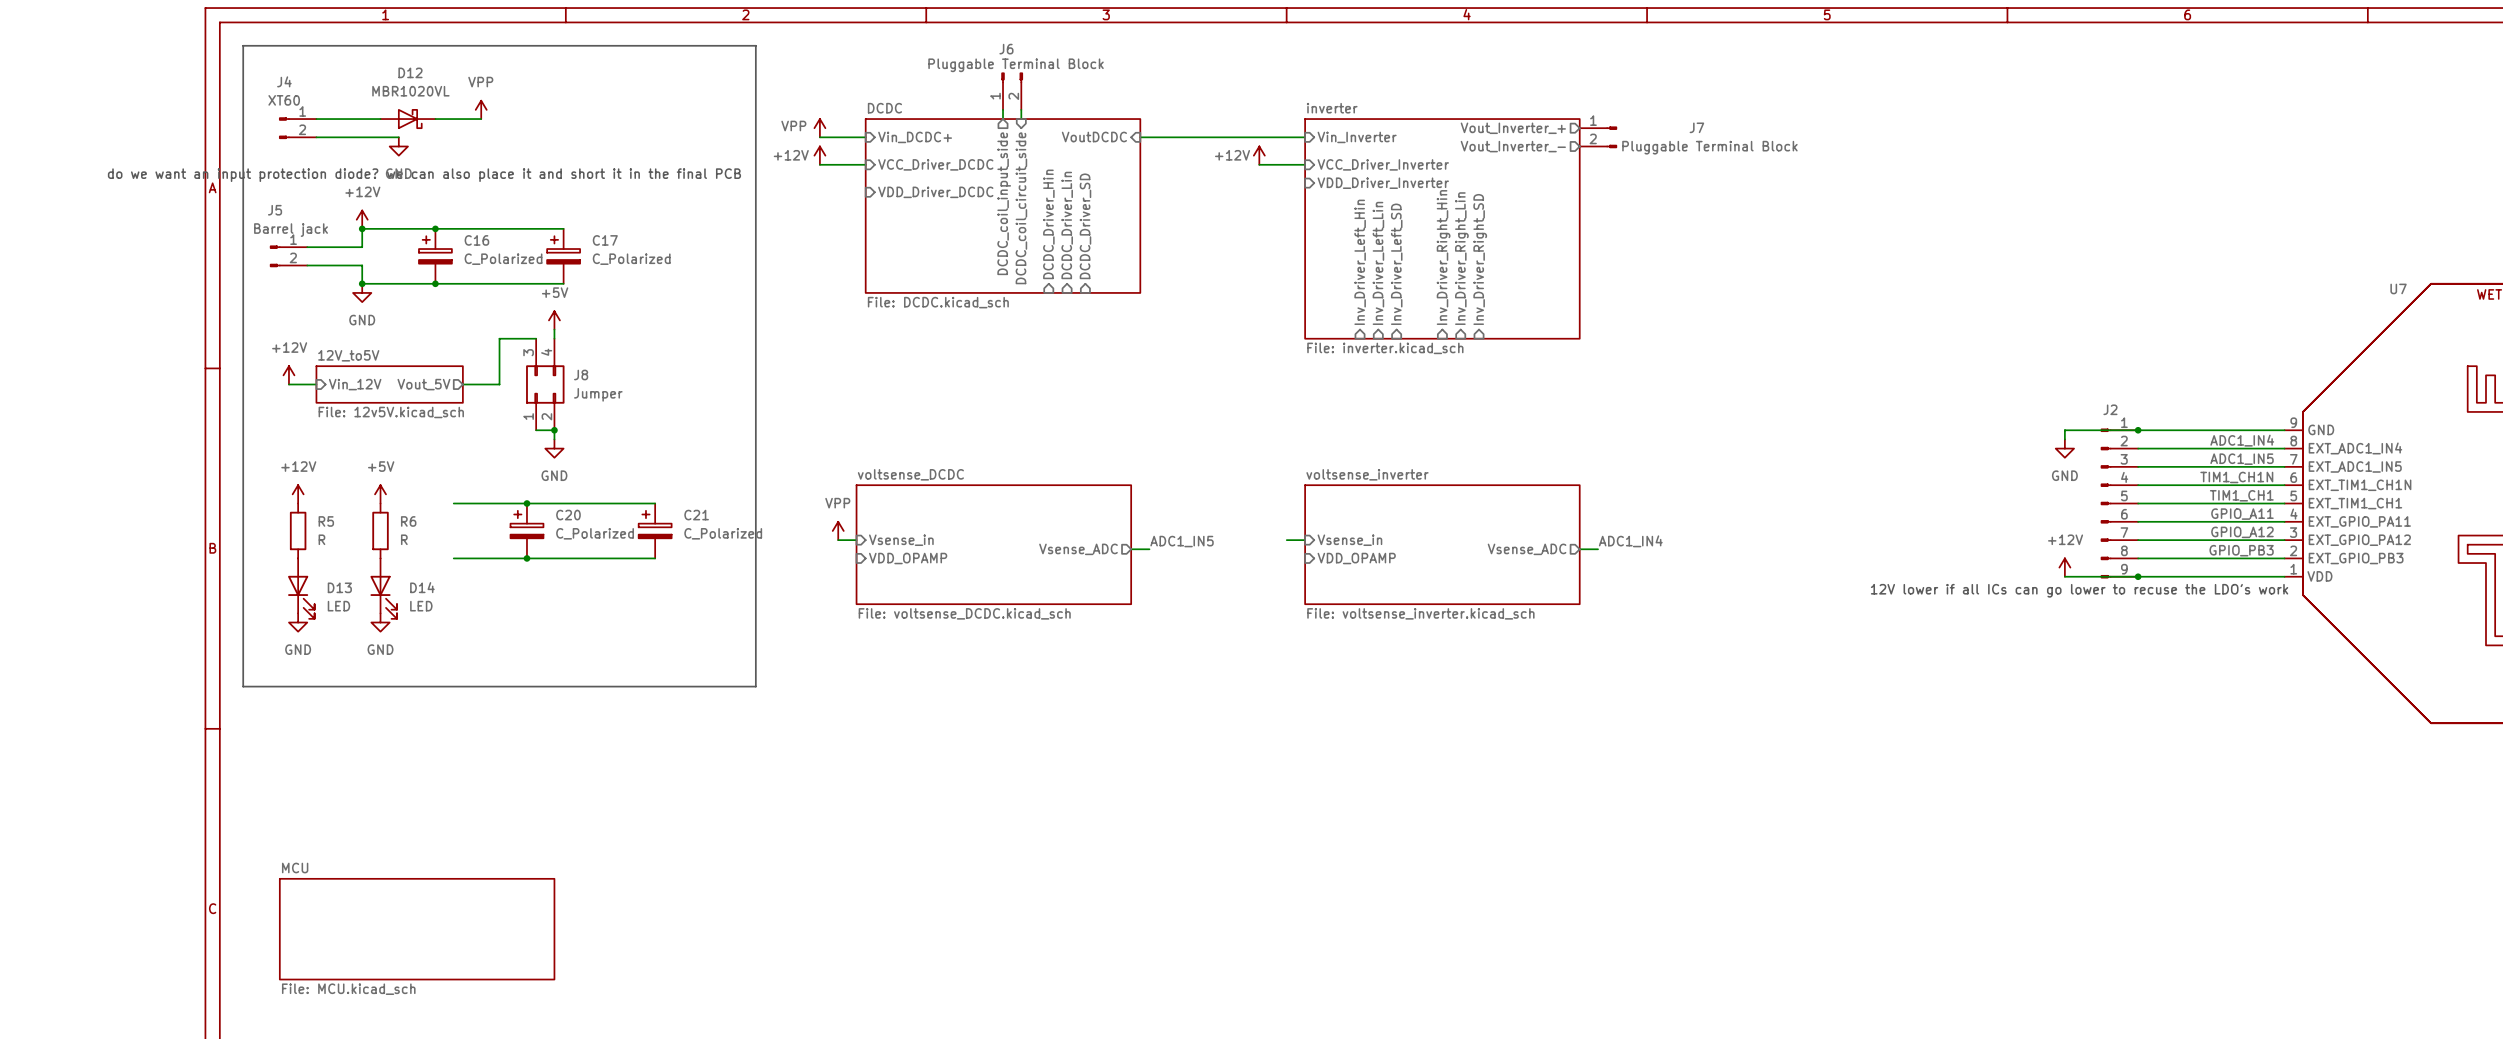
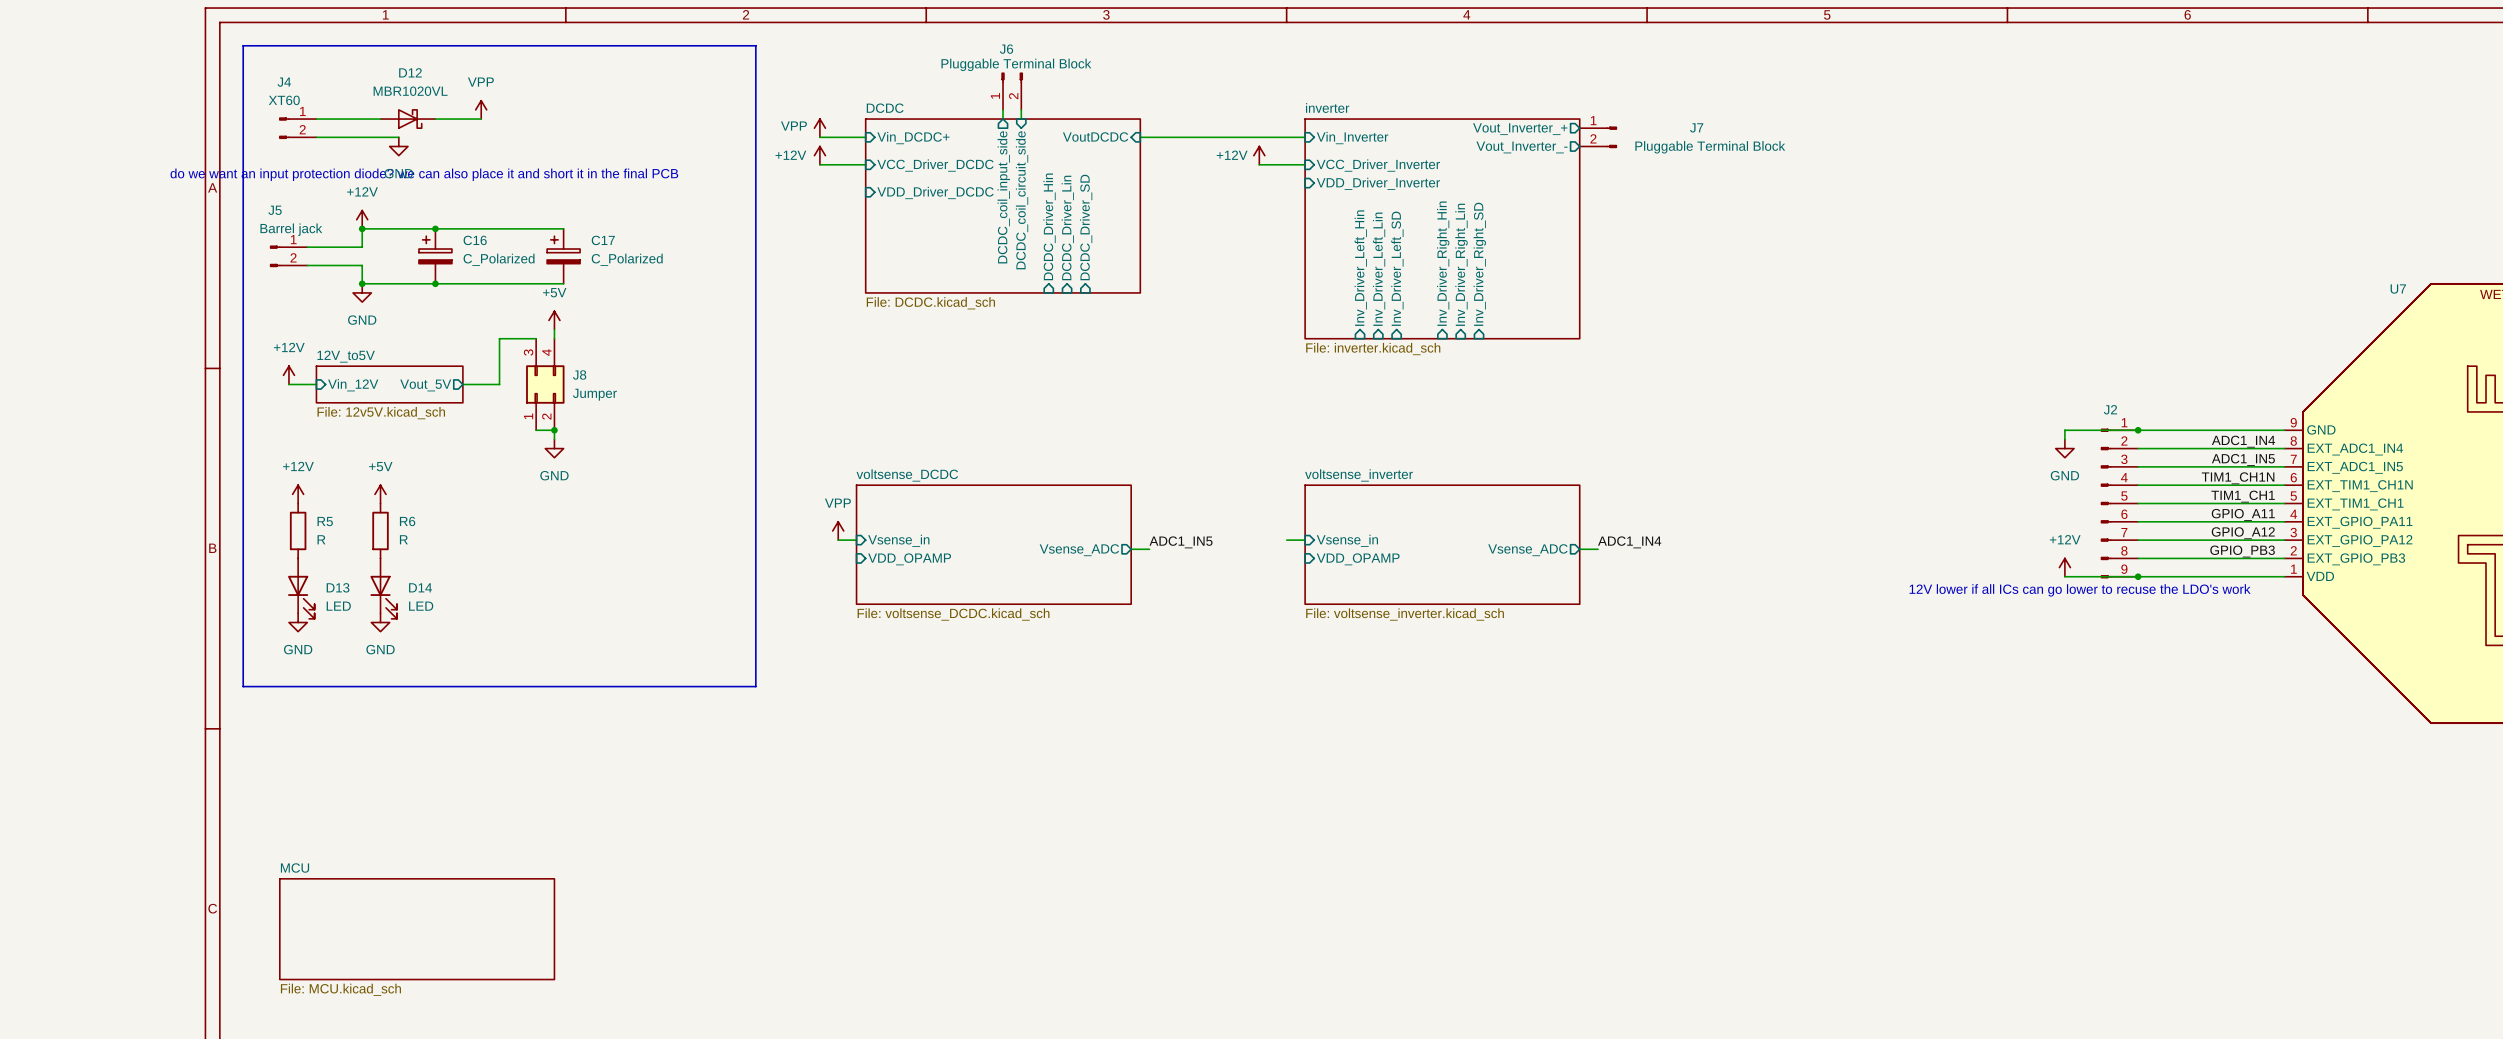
wire: (453, 503) (655, 503) -> none
junction: (526, 503) -> none
C20: C_Polarized (526, 530) -> none
C21: C_Polarized (655, 530) -> none
wire: (453, 558) (655, 558) -> none
junction: (526, 558) -> none

